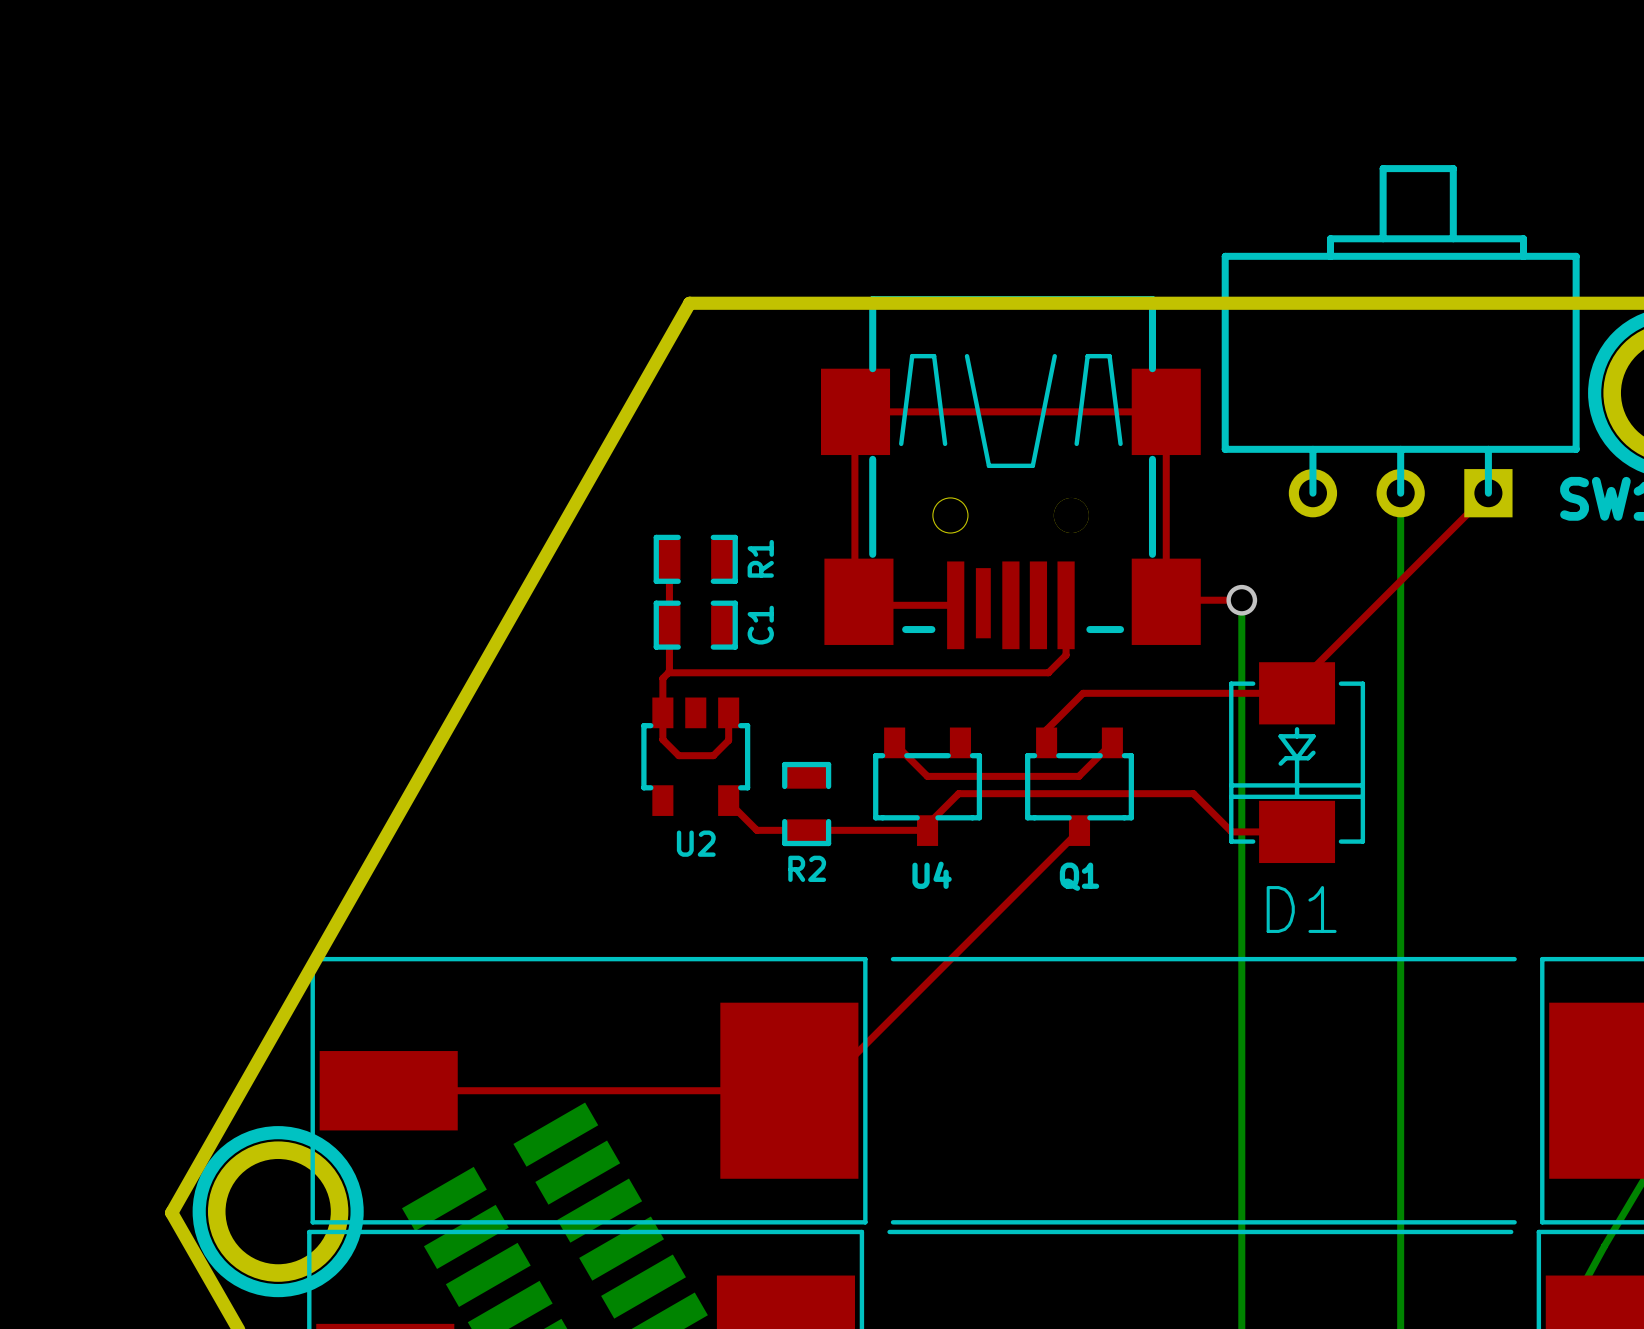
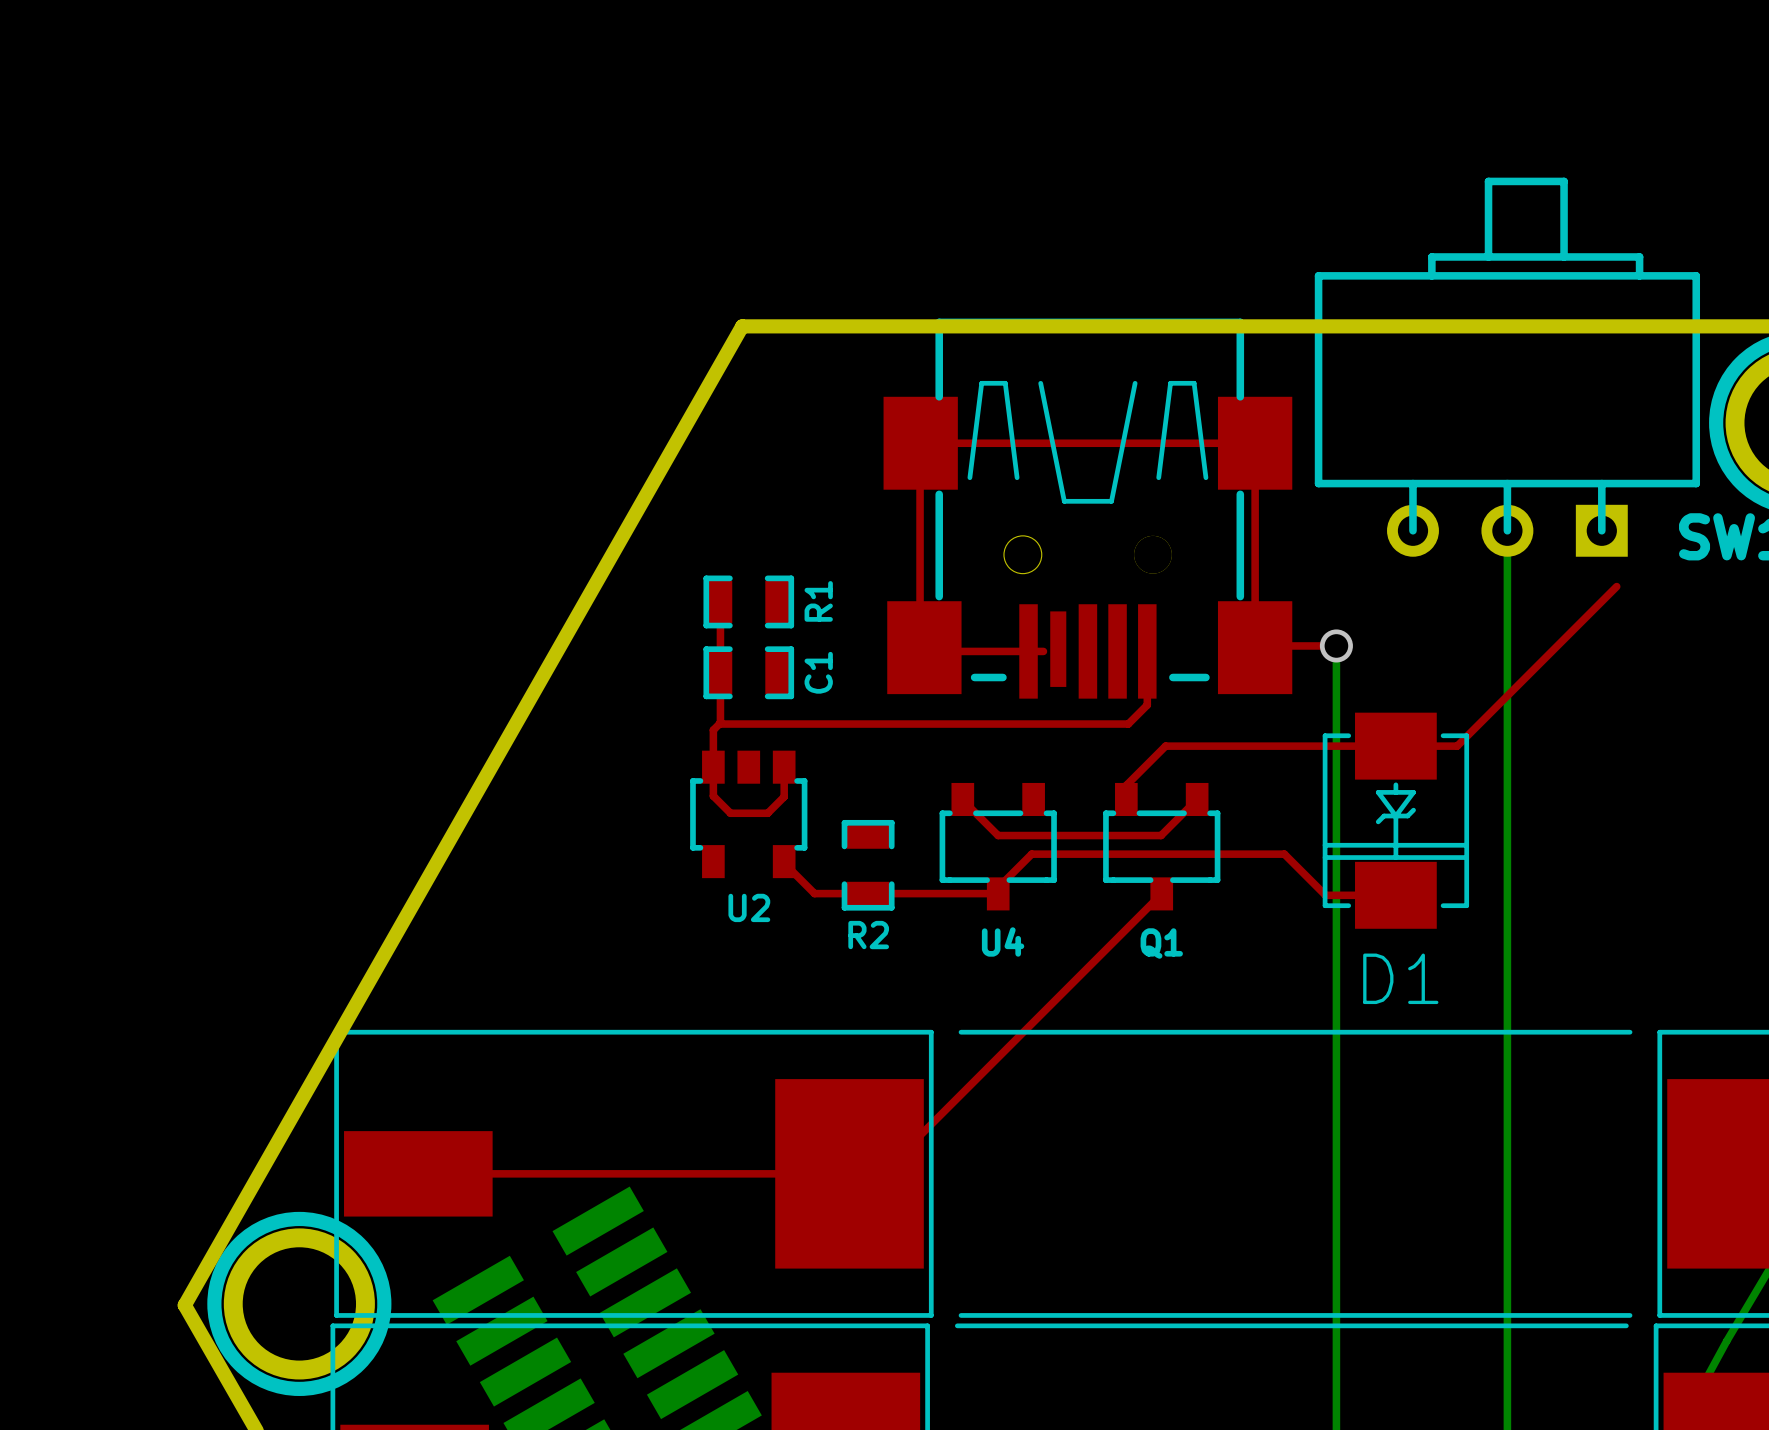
top track: (1488, 493) (1297, 684) (1297, 693) -> (1616, 586) (1457, 746) (1395, 746)
top track: none -> (1028, 651) (1043, 651)

